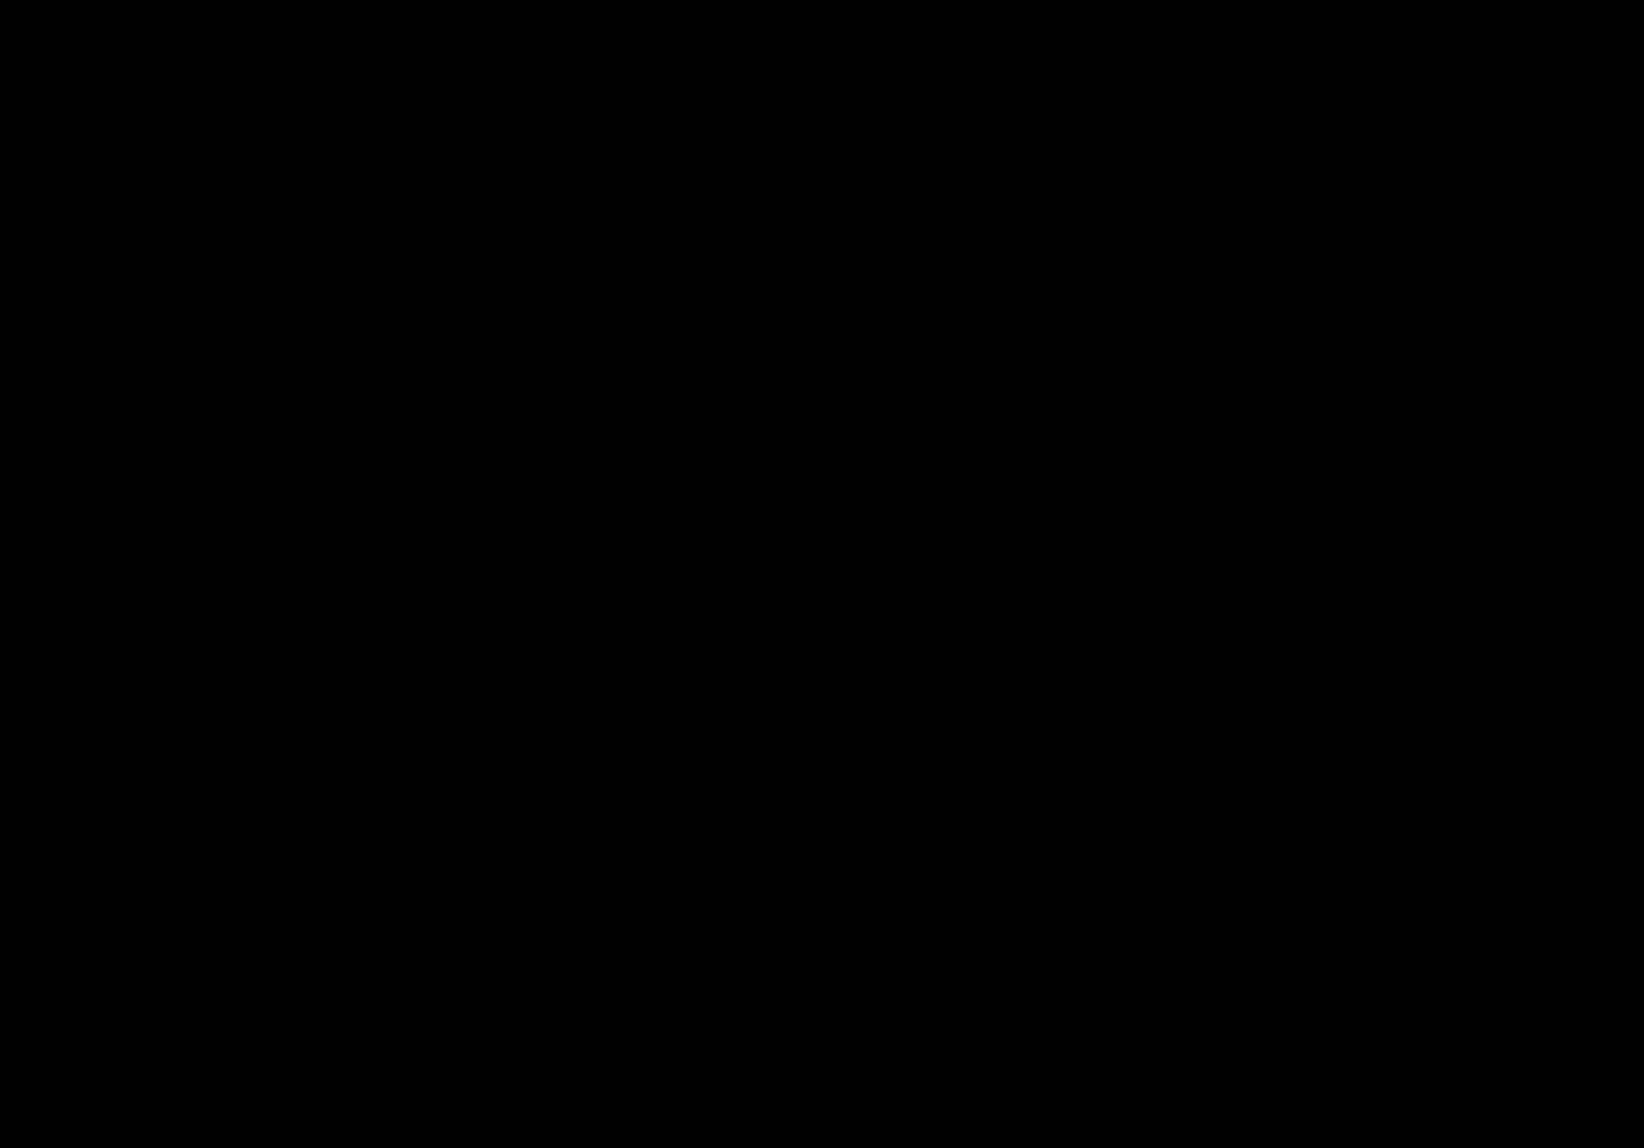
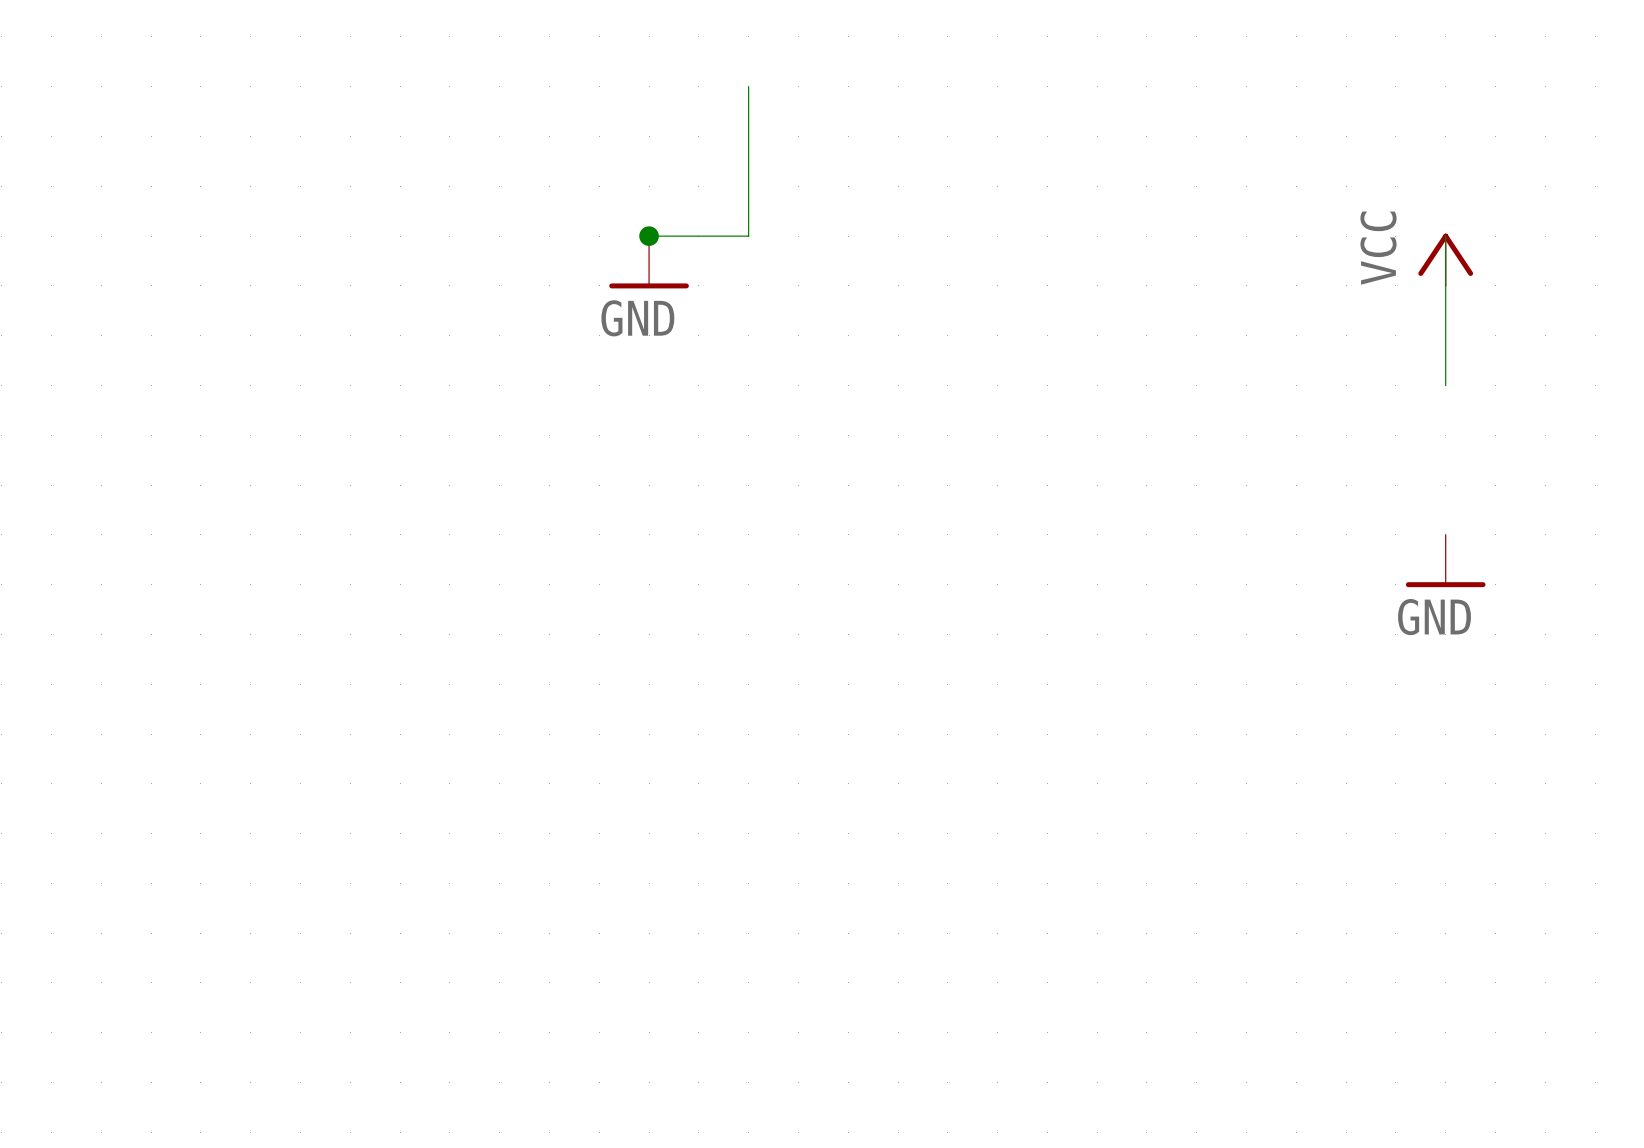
wire: none -> (748, 86) (748, 236) (649, 236)
junction: none -> (649, 236)
wire: none -> (1445, 236) (1445, 385)
power symbol: none -> VCC (1445, 259)
power symbol: none -> GND (649, 262)
power symbol: none -> GND (1445, 561)

